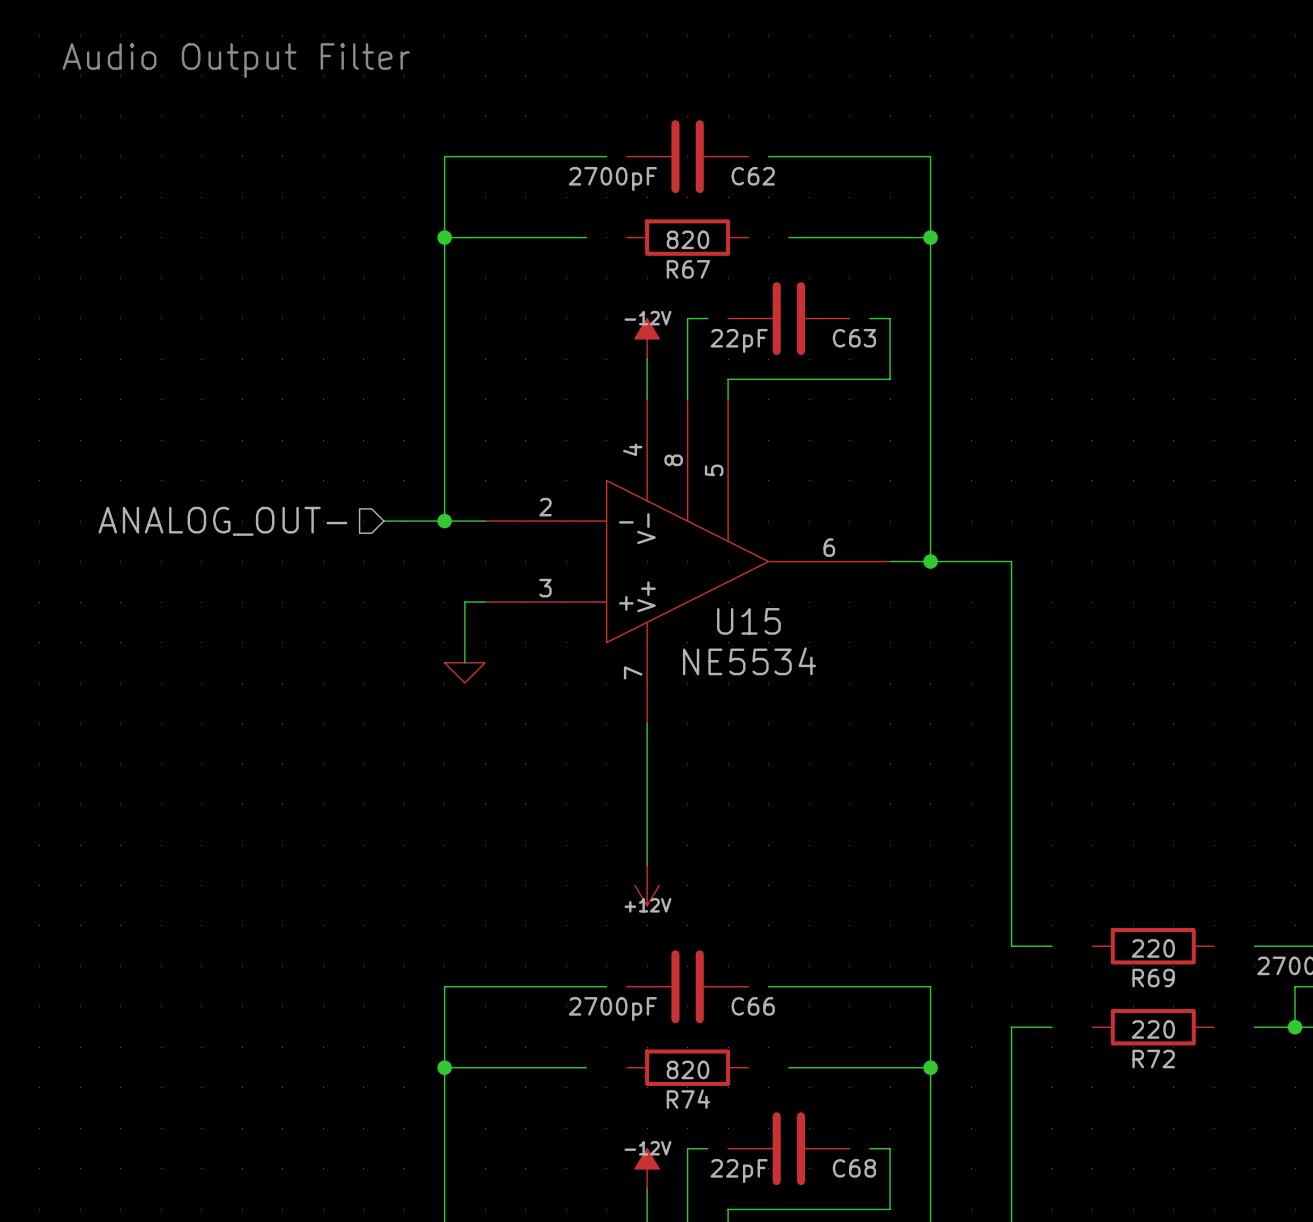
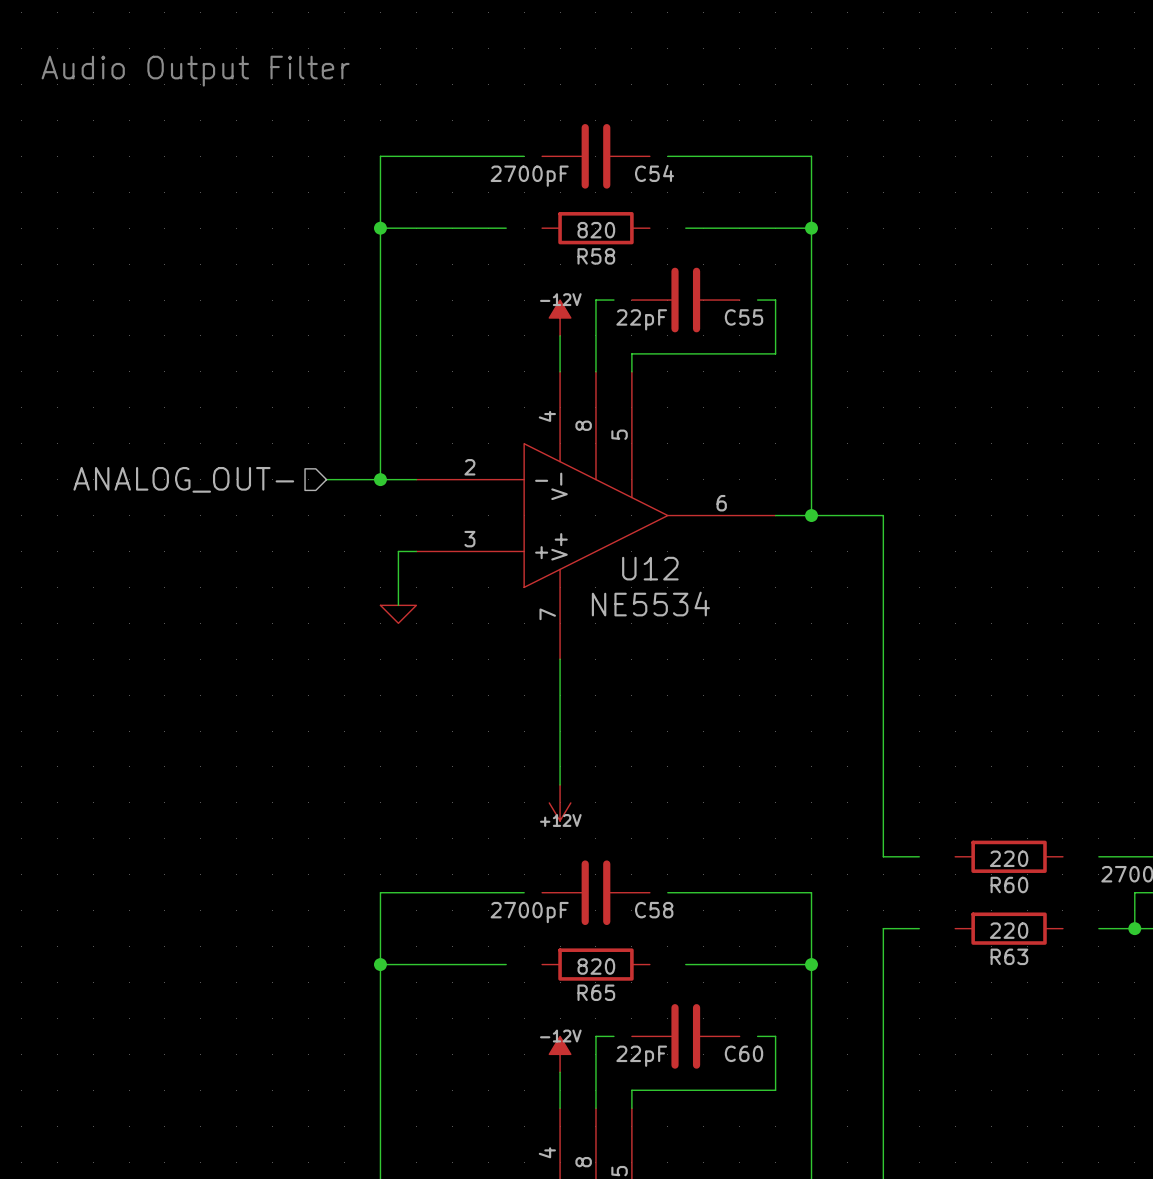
C62 name: C62 (753, 176) -> C54 (654, 173)
R67 name: R67 (688, 269) -> R58 (596, 256)
C63 name: C63 (854, 338) -> C55 (743, 317)
U15 name: U15 (748, 621) -> U12 (650, 568)
R69 name: R69 (1153, 978) -> R60 (1009, 885)
C66 name: C66 (753, 1006) -> C58 (654, 910)
R72 name: R72 (1153, 1059) -> R63 (1009, 956)
R74 name: R74 (688, 1099) -> R65 (596, 992)
C68 name: C68 (854, 1168) -> C60 (743, 1053)

